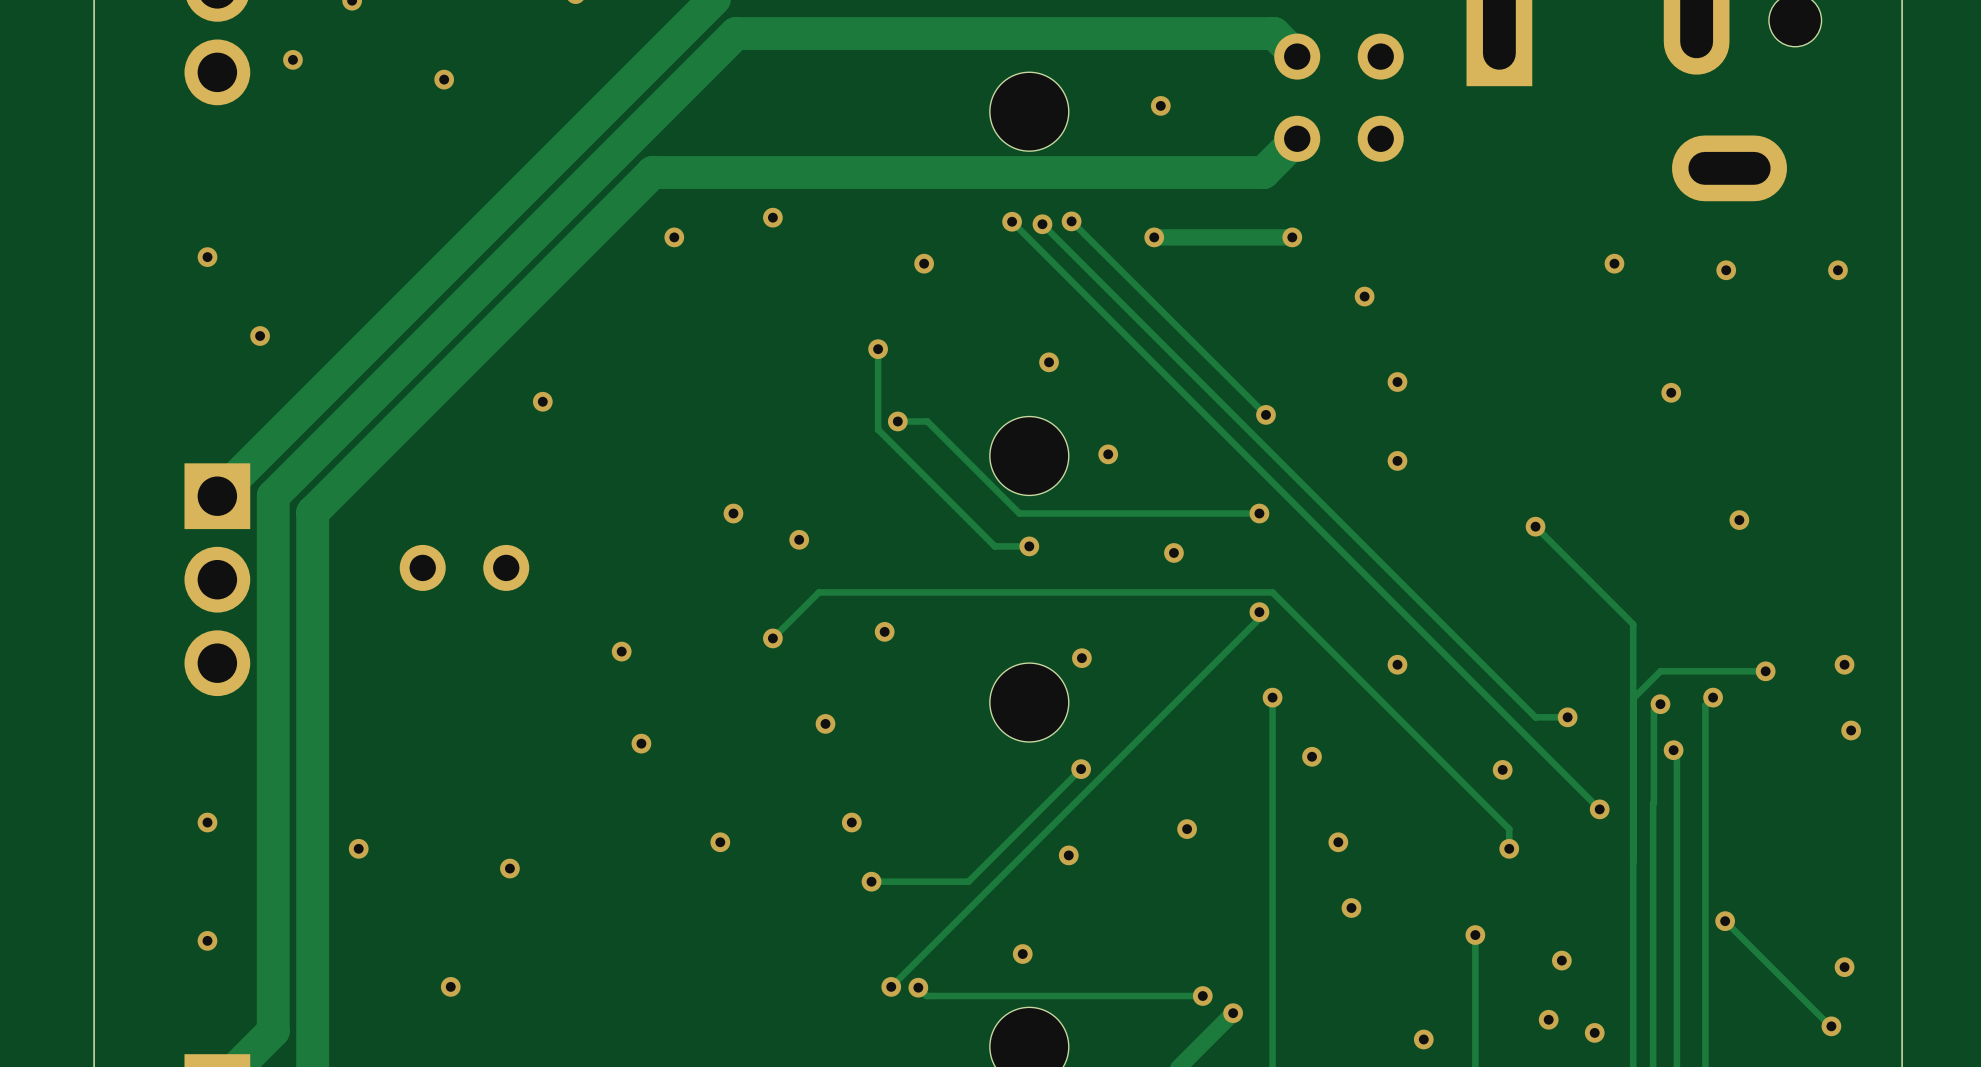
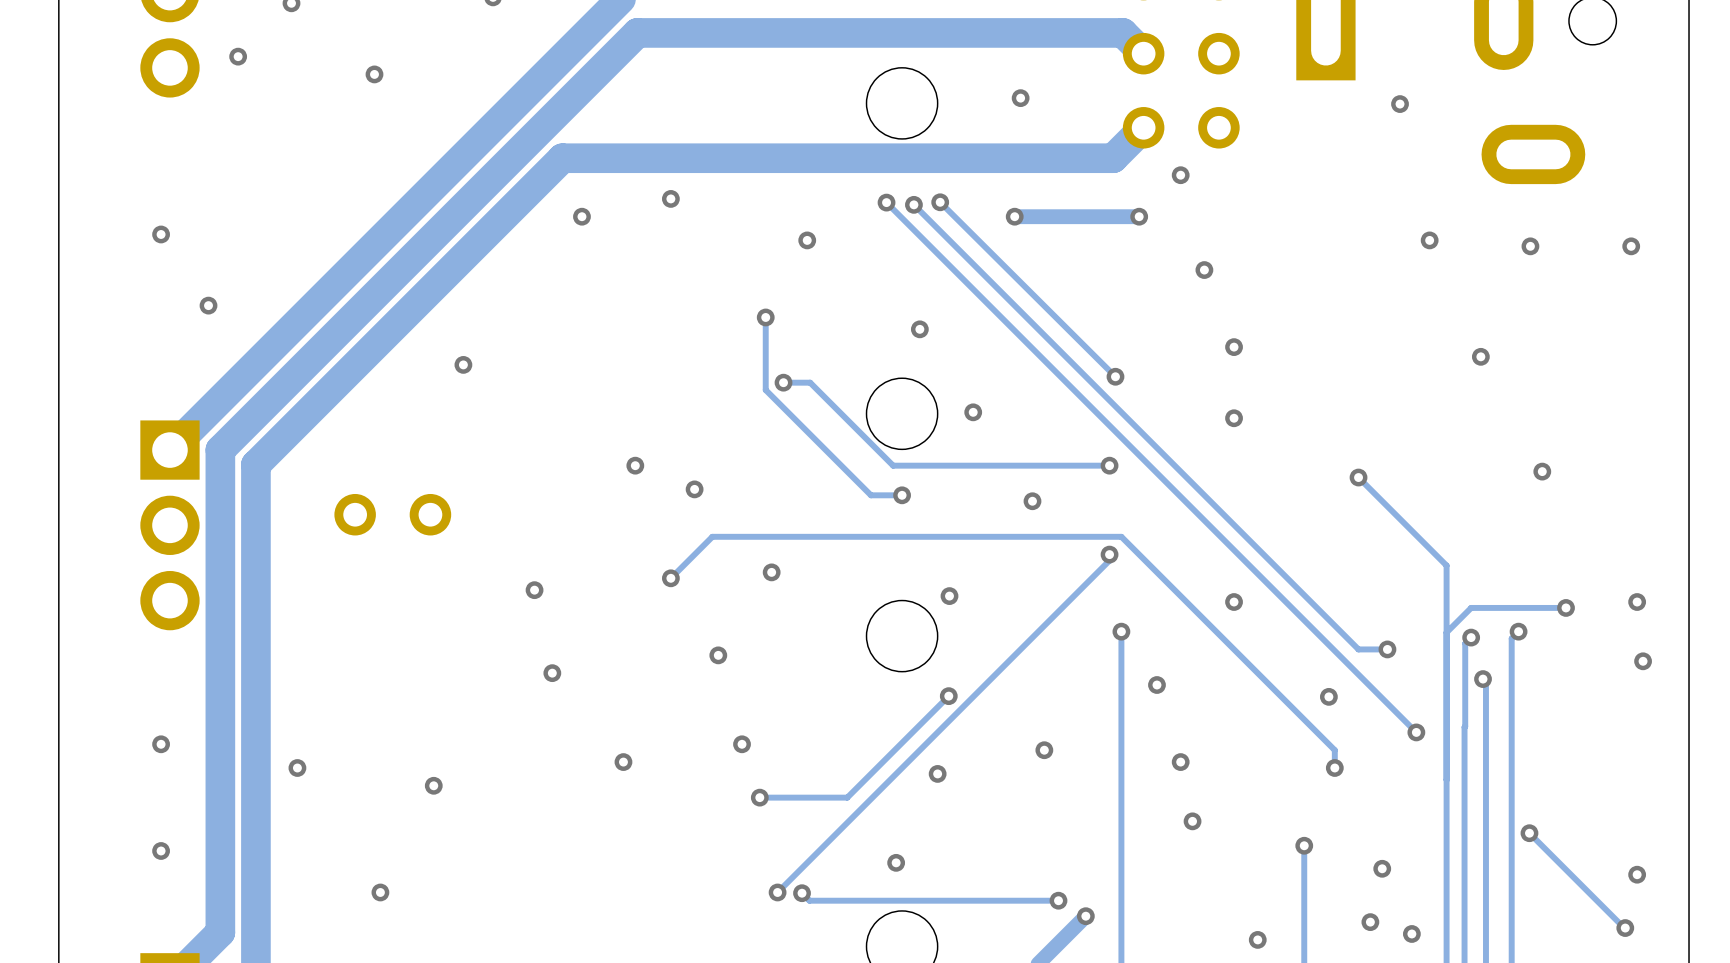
via: none -> (1400, 104)
via: none -> (1180, 175)

